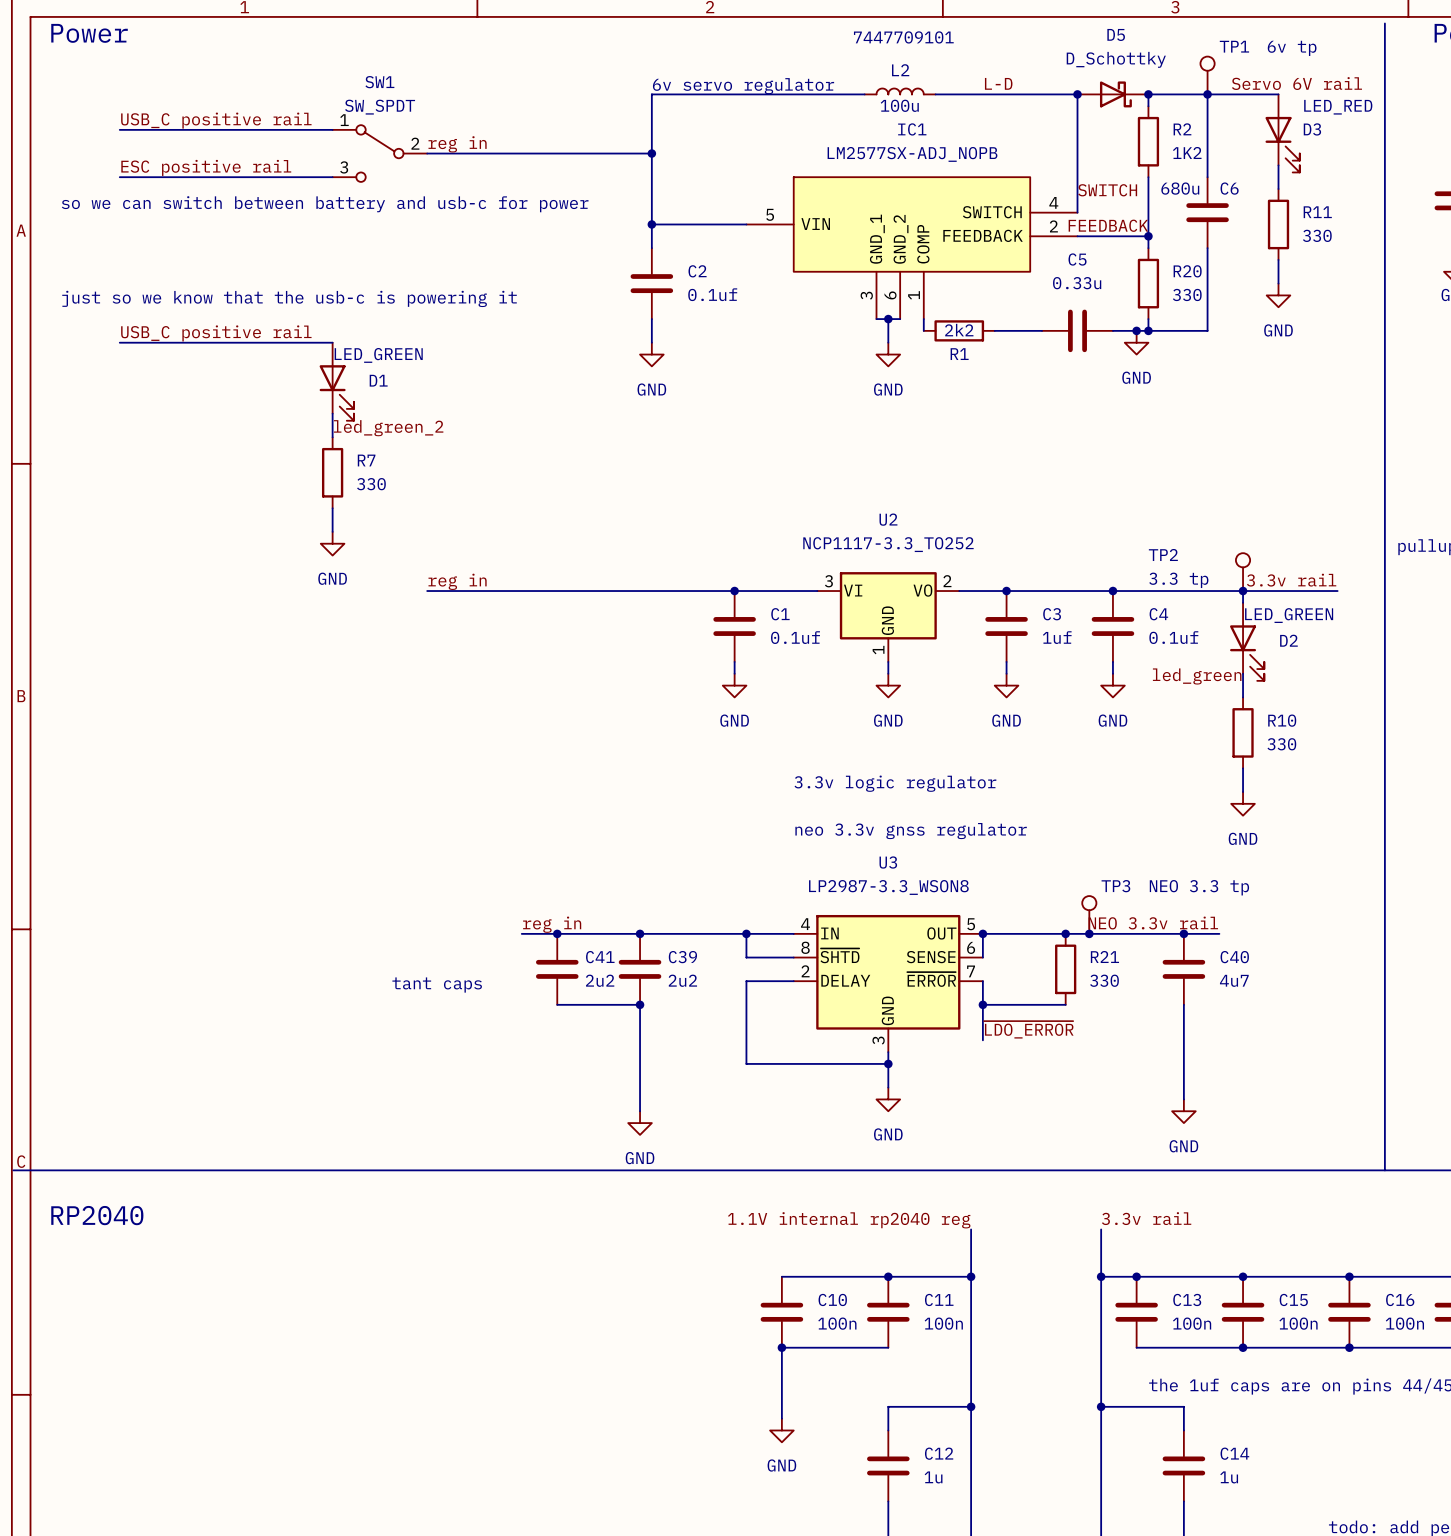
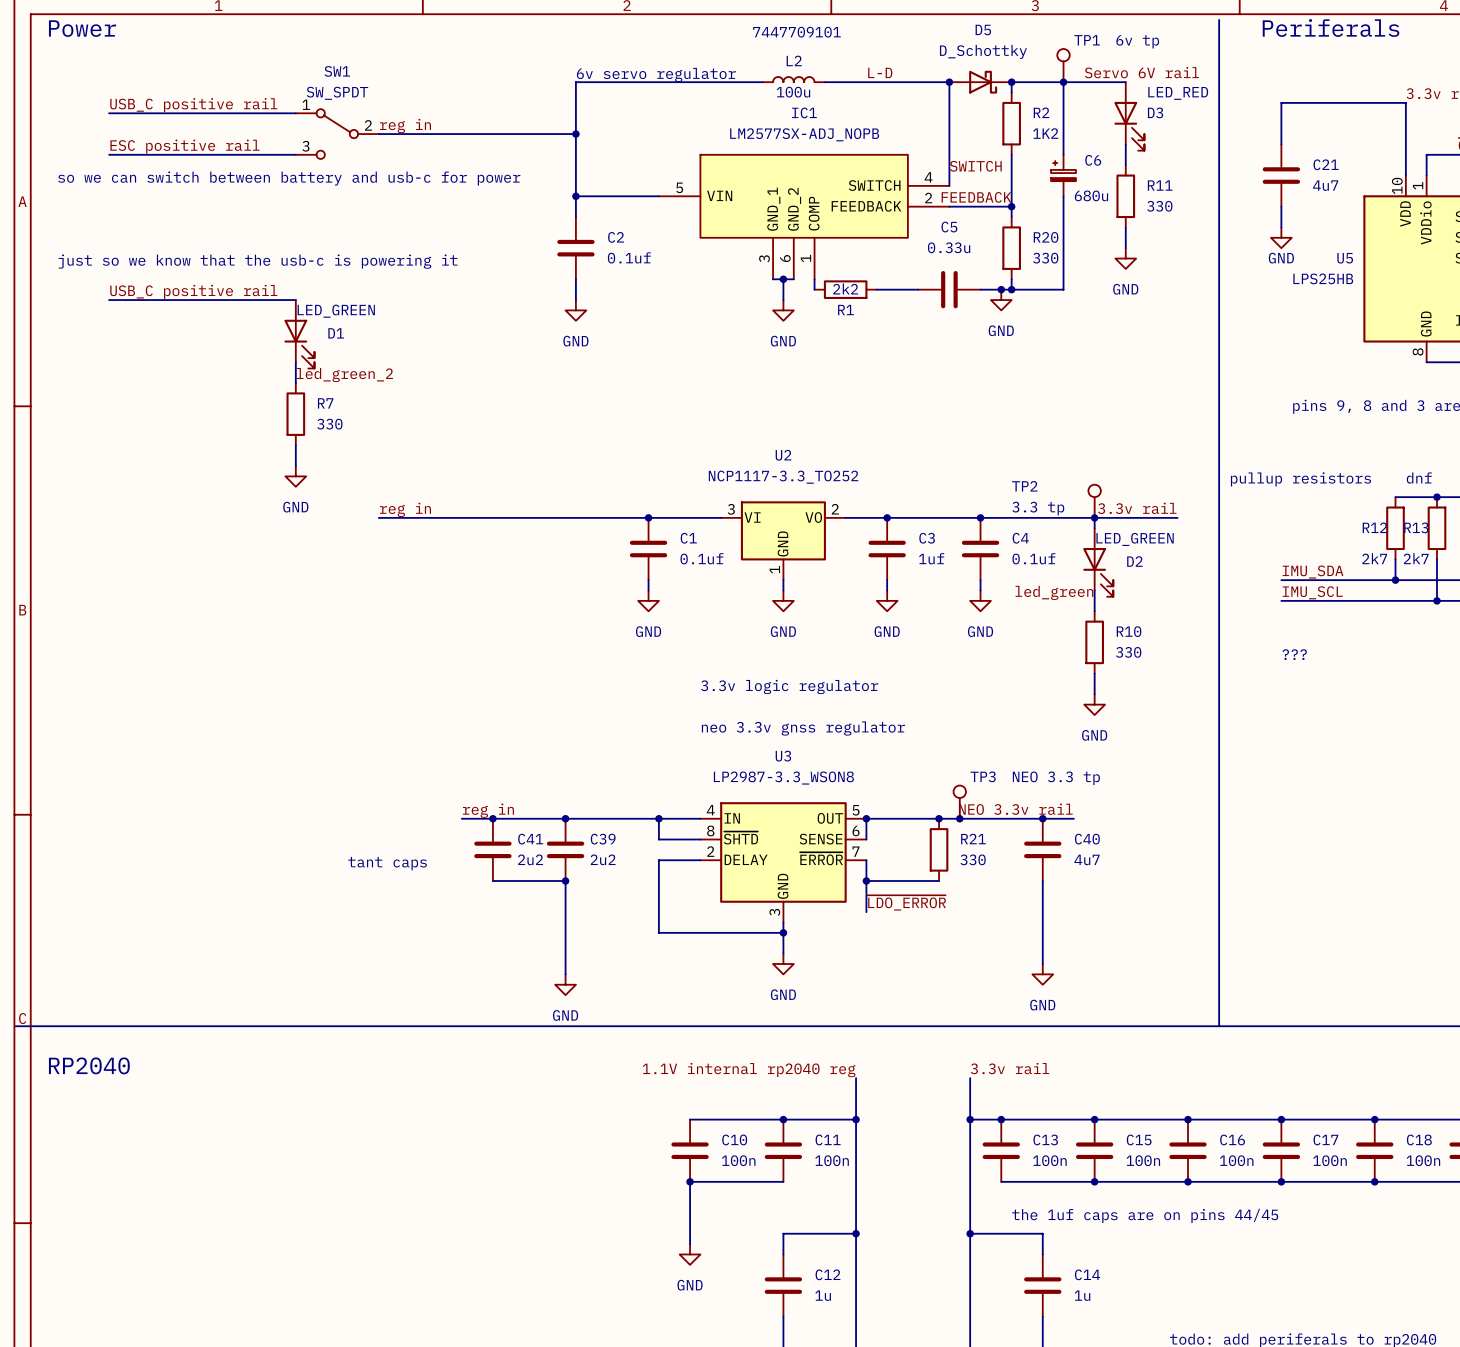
C6 symbol: [1186, 177, 1229, 249] -> [1051, 154, 1076, 197]
C6 value position: 680u (1180, 188) -> 680u (1091, 195)

